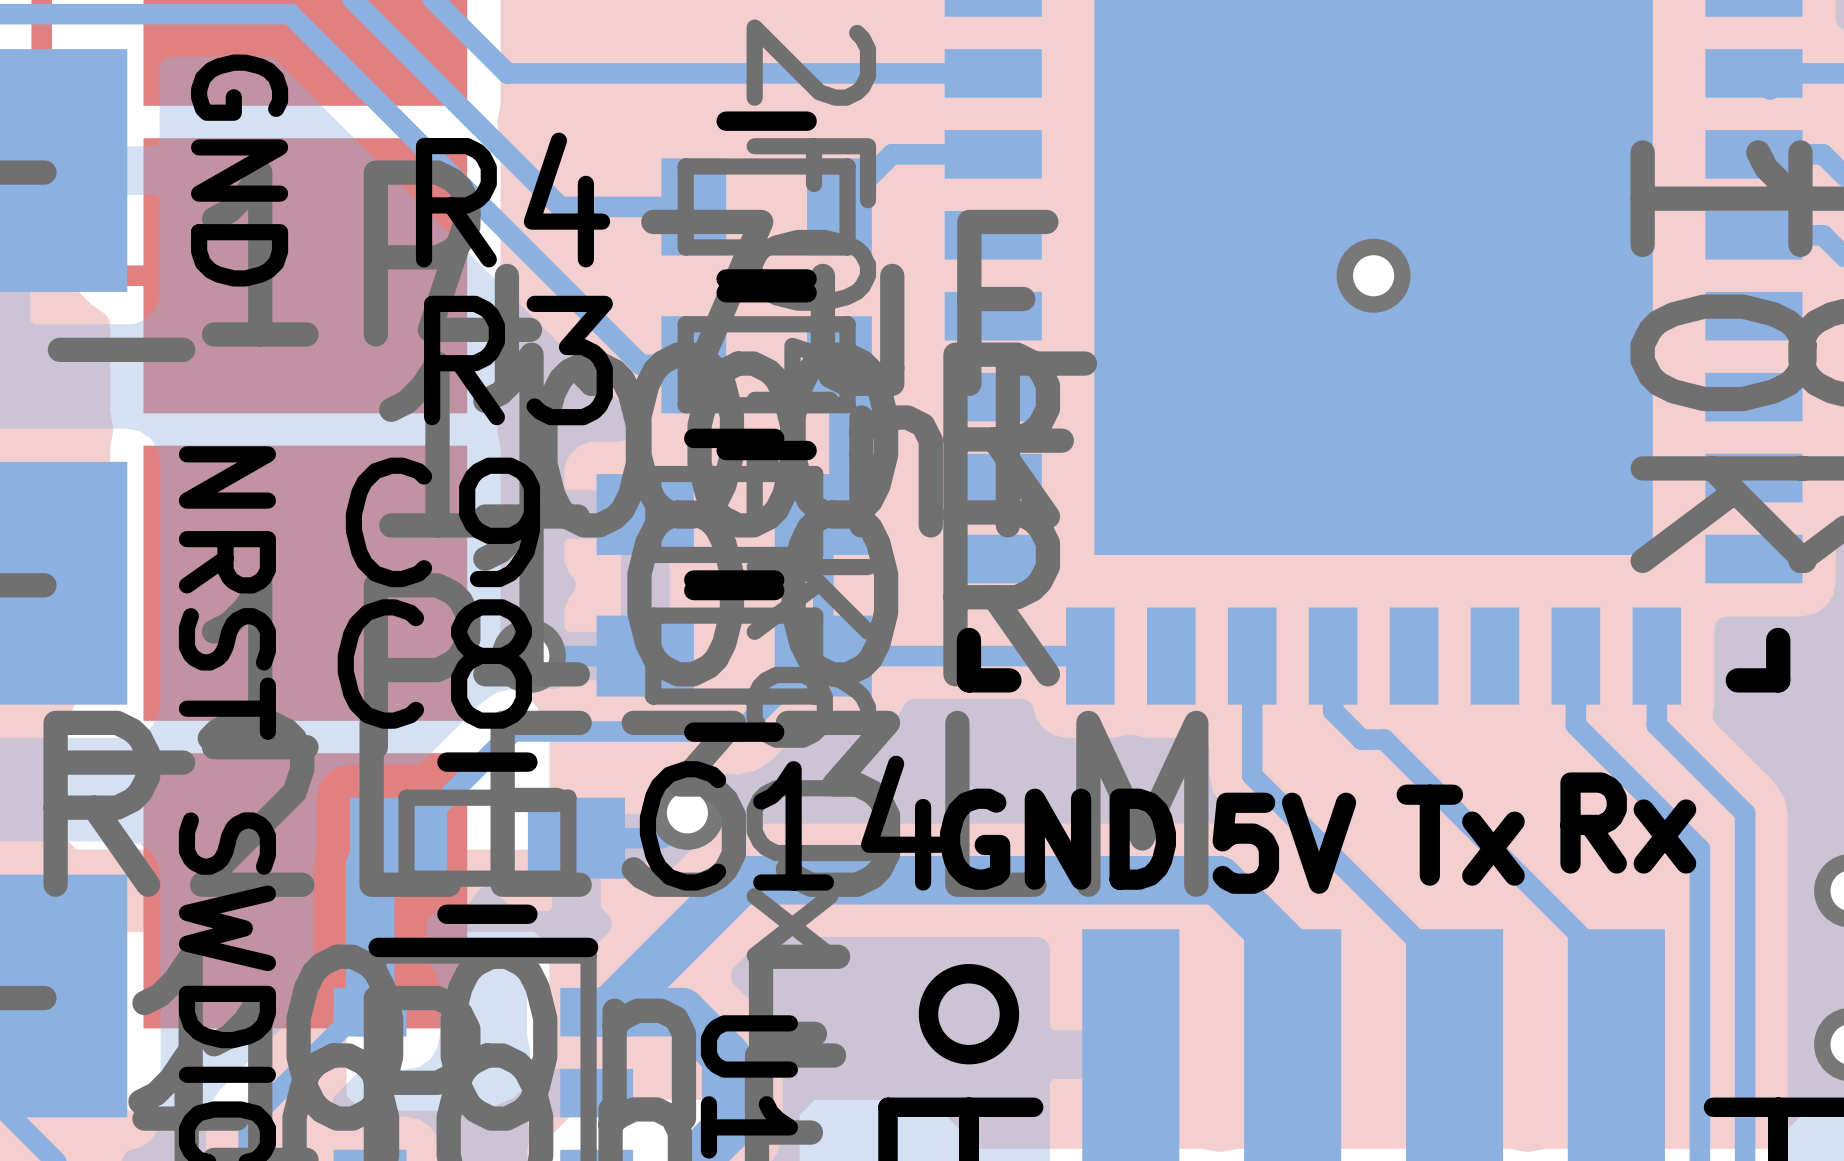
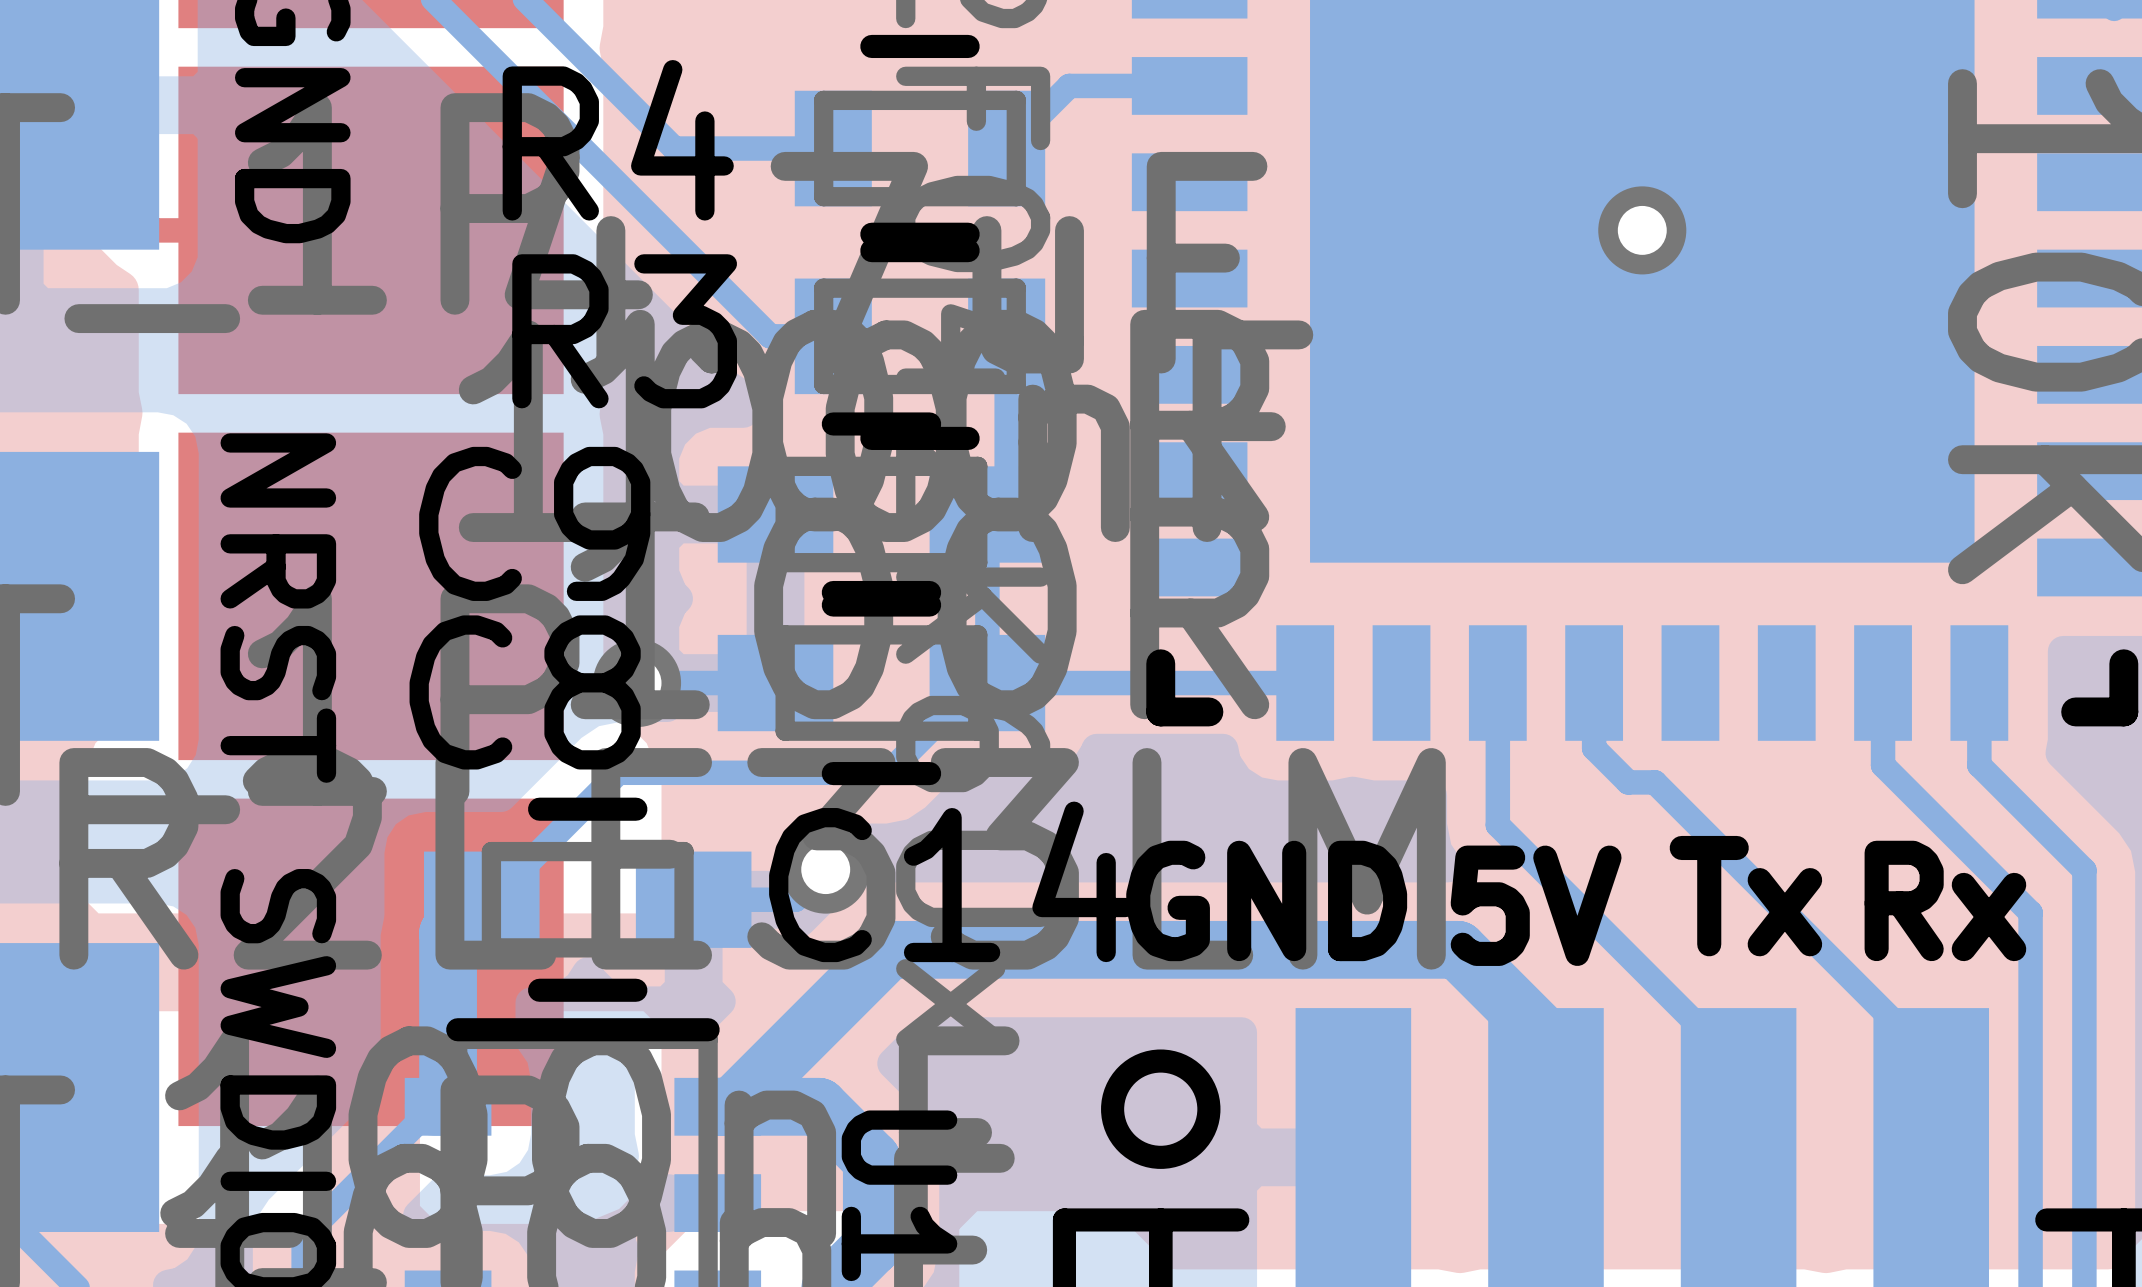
text position: Rx (1628, 823) -> Rx (1945, 900)

